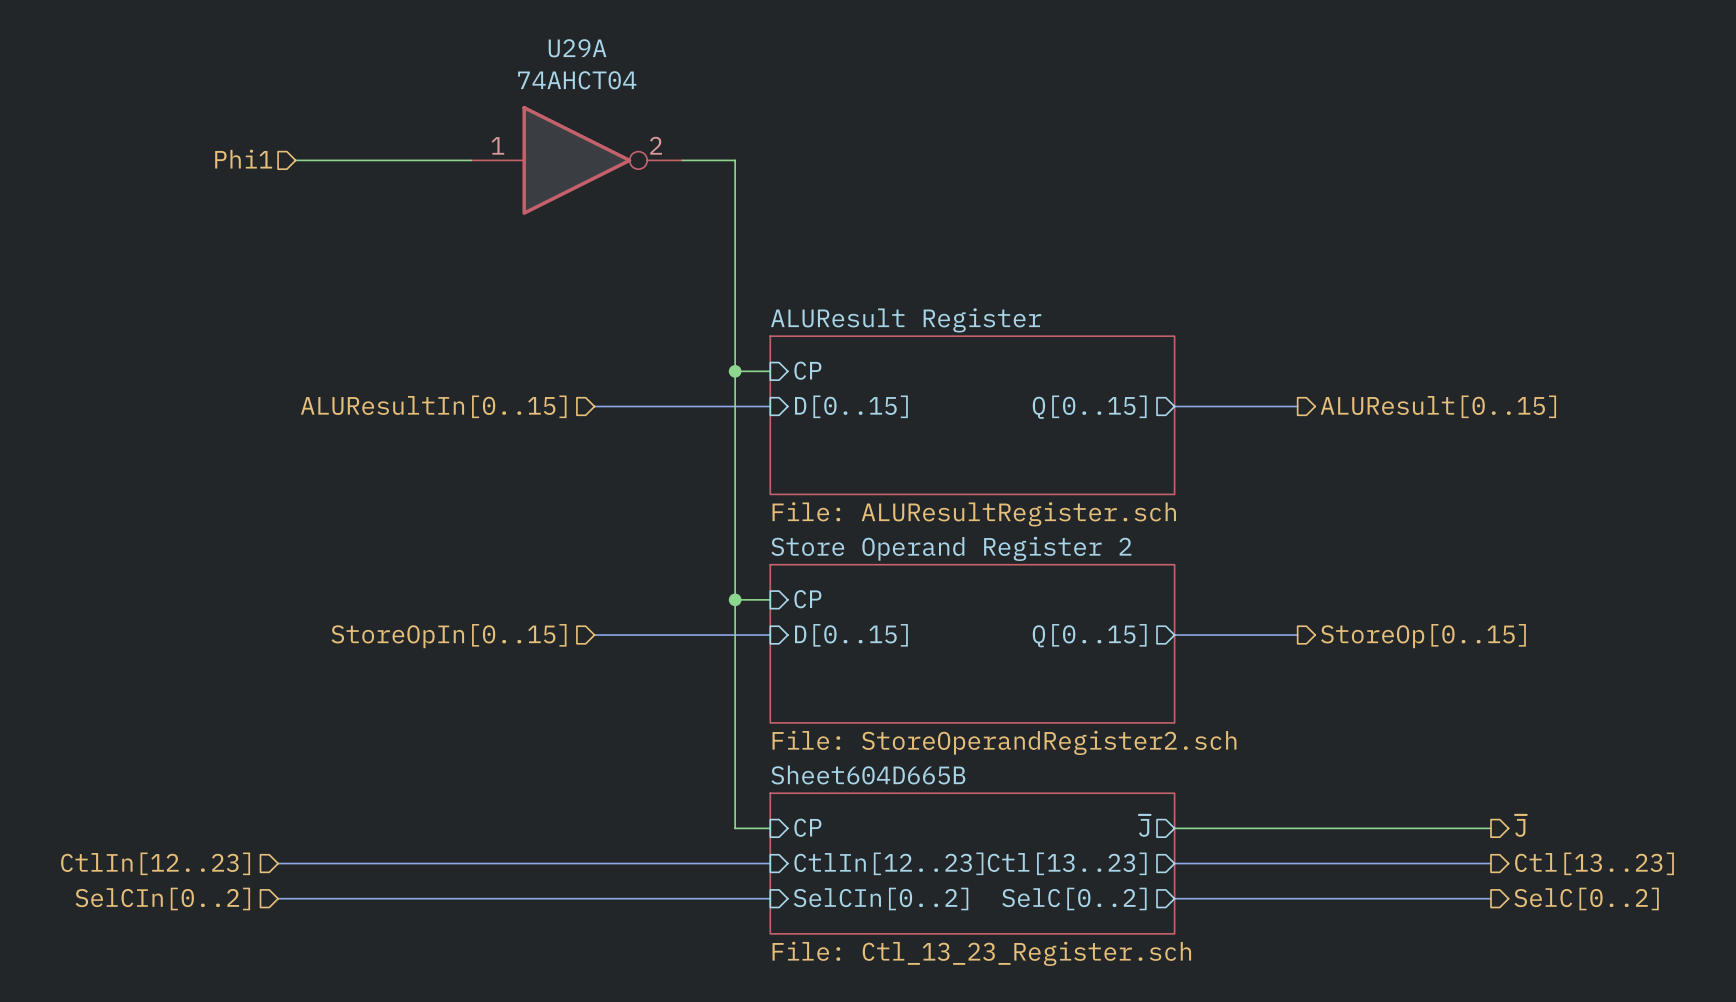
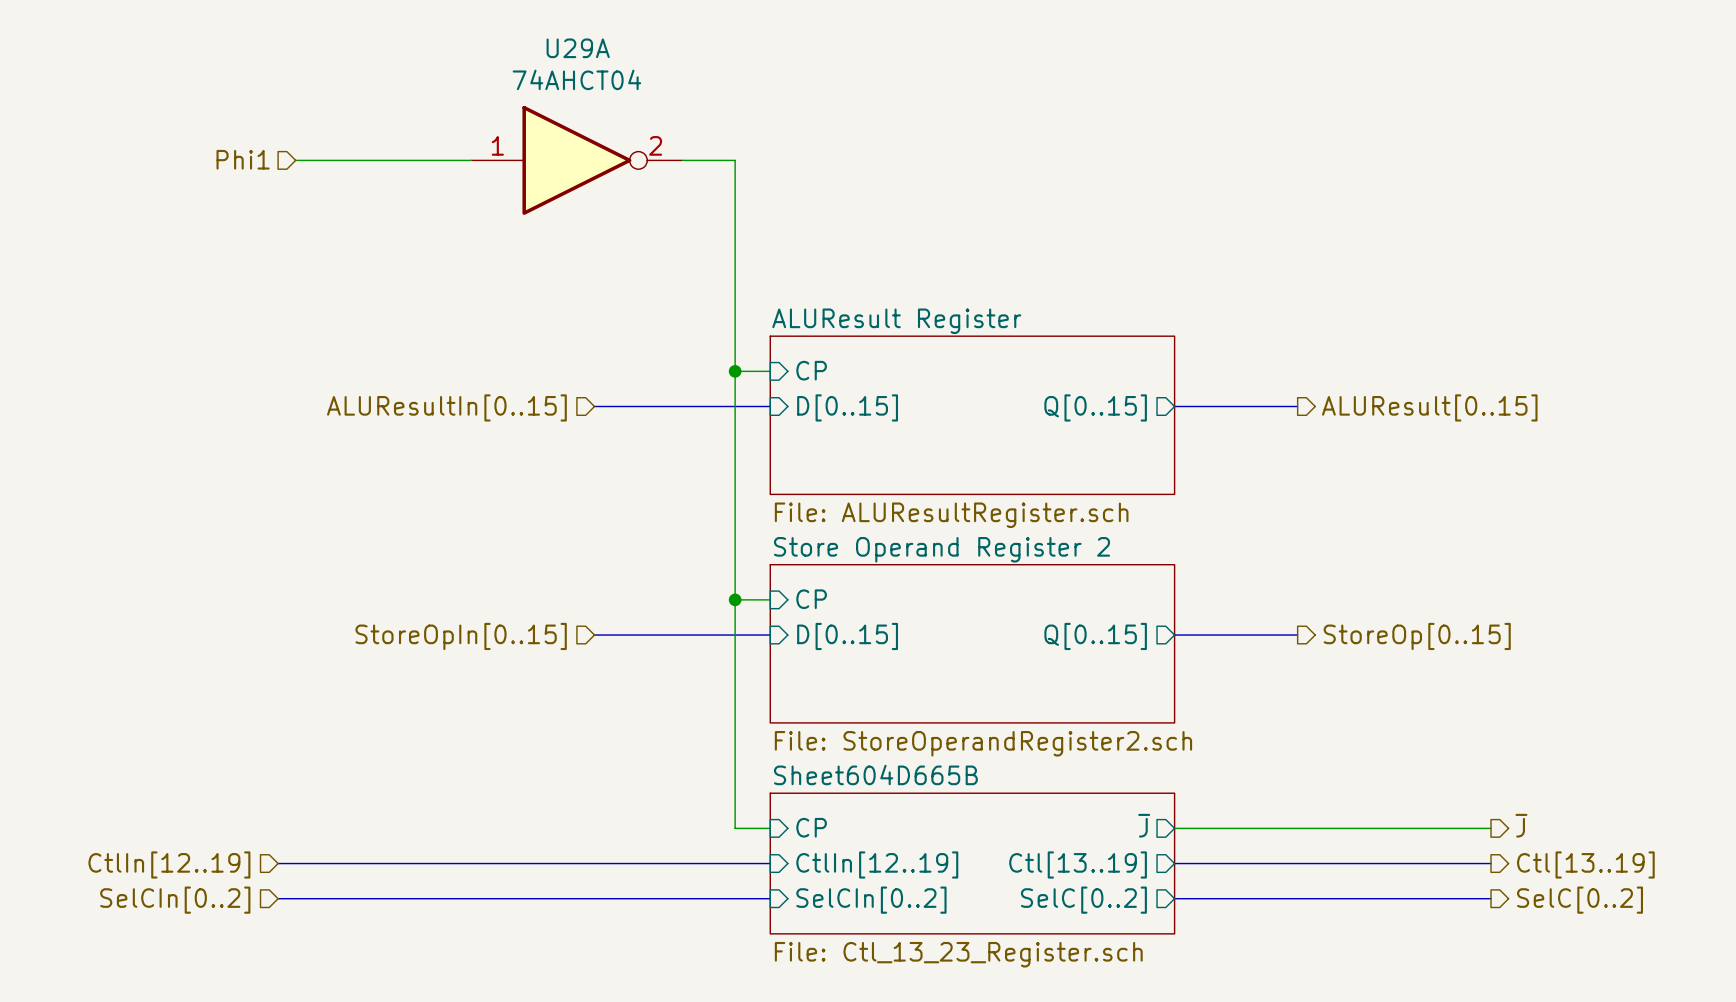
hierarchical label: CtlIn[12..23] (155, 863) -> CtlIn[12..19] (169, 864)
sheet pin: CtlIn[12..23] (888, 863) -> CtlIn[12..19] (877, 864)
sheet pin: Ctl[13..23] (1067, 863) -> Ctl[13..19] (1078, 864)
hierarchical label: Ctl[13..23] (1594, 863) -> Ctl[13..19] (1585, 864)

